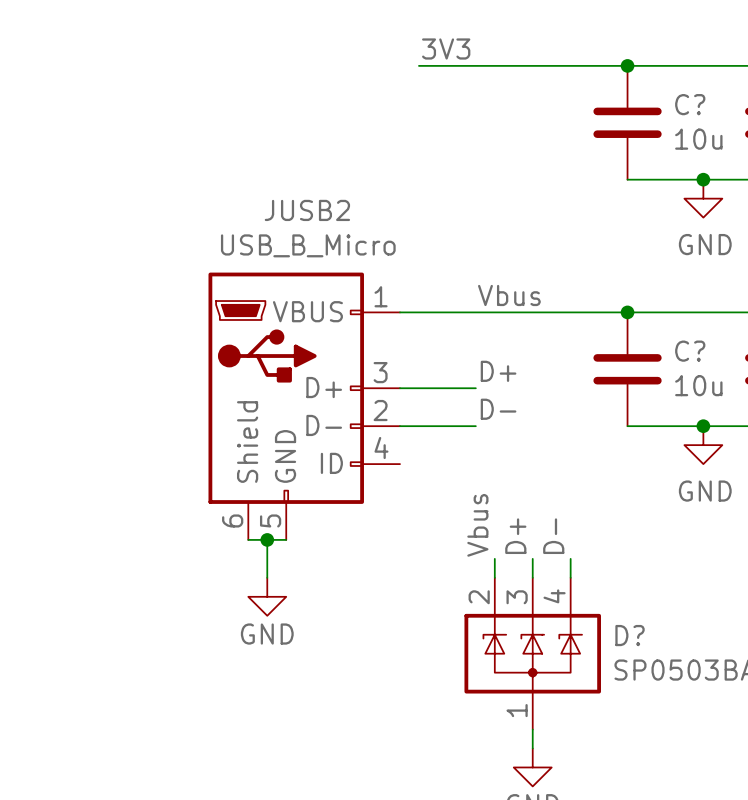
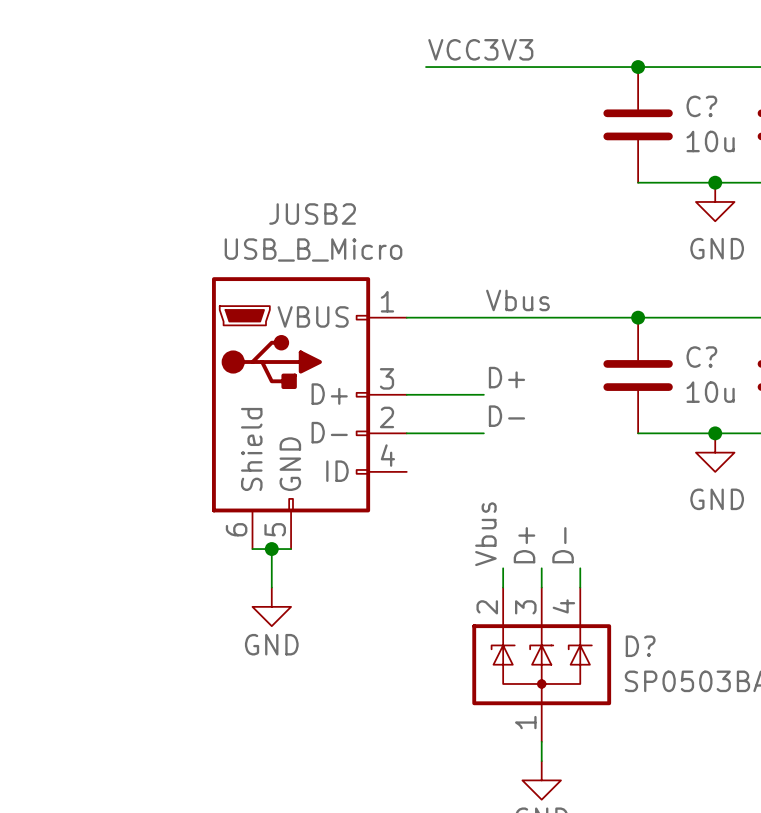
label: 3V3 (446, 48) -> VCC3V3 (480, 49)

